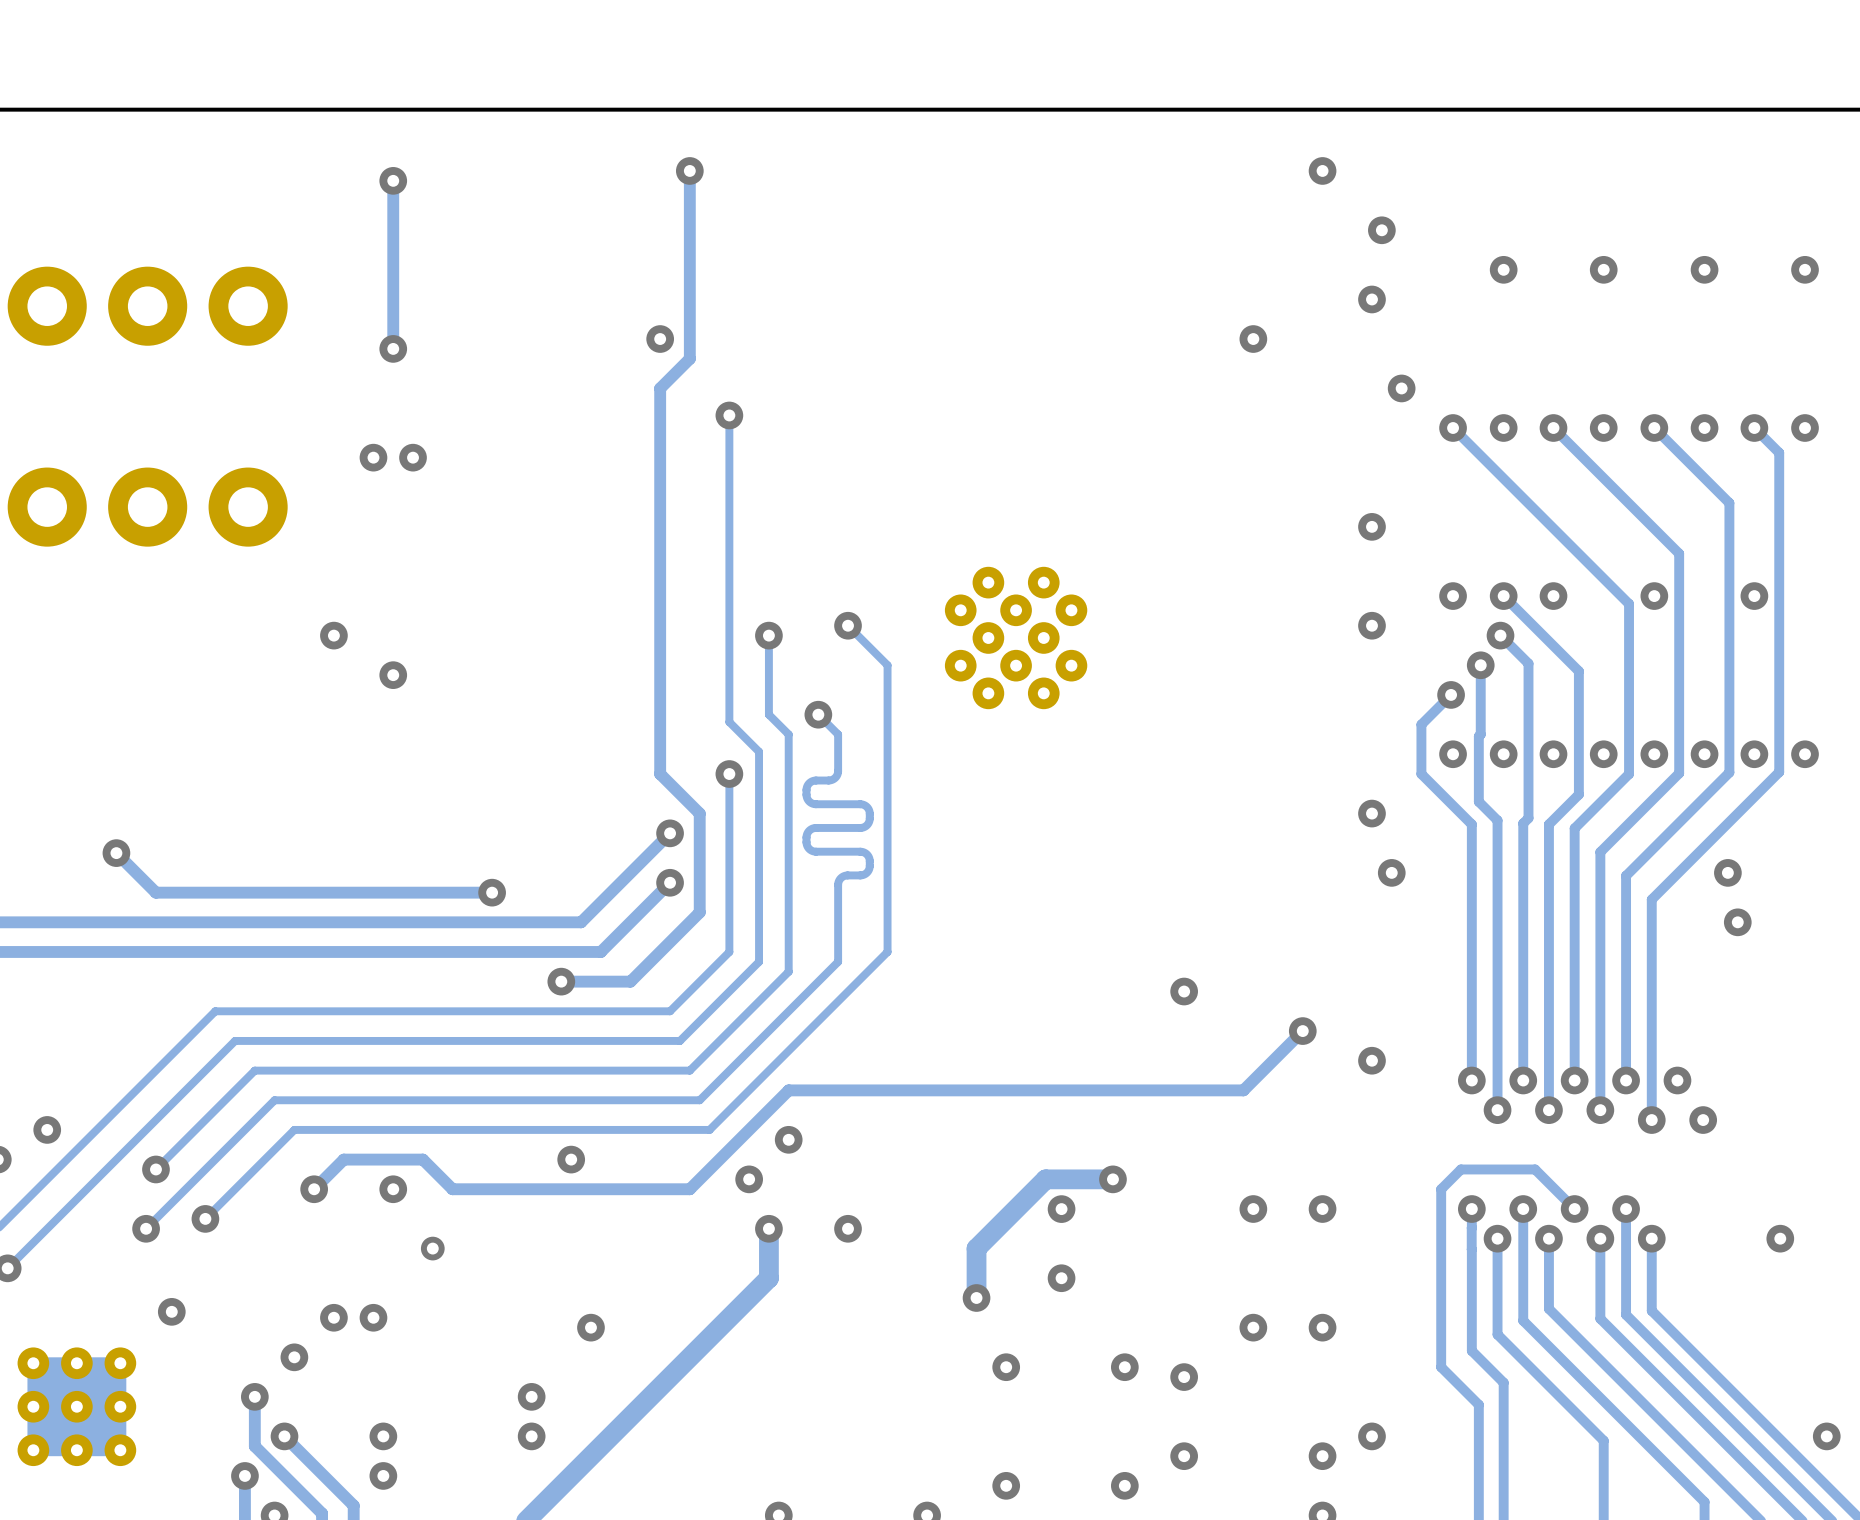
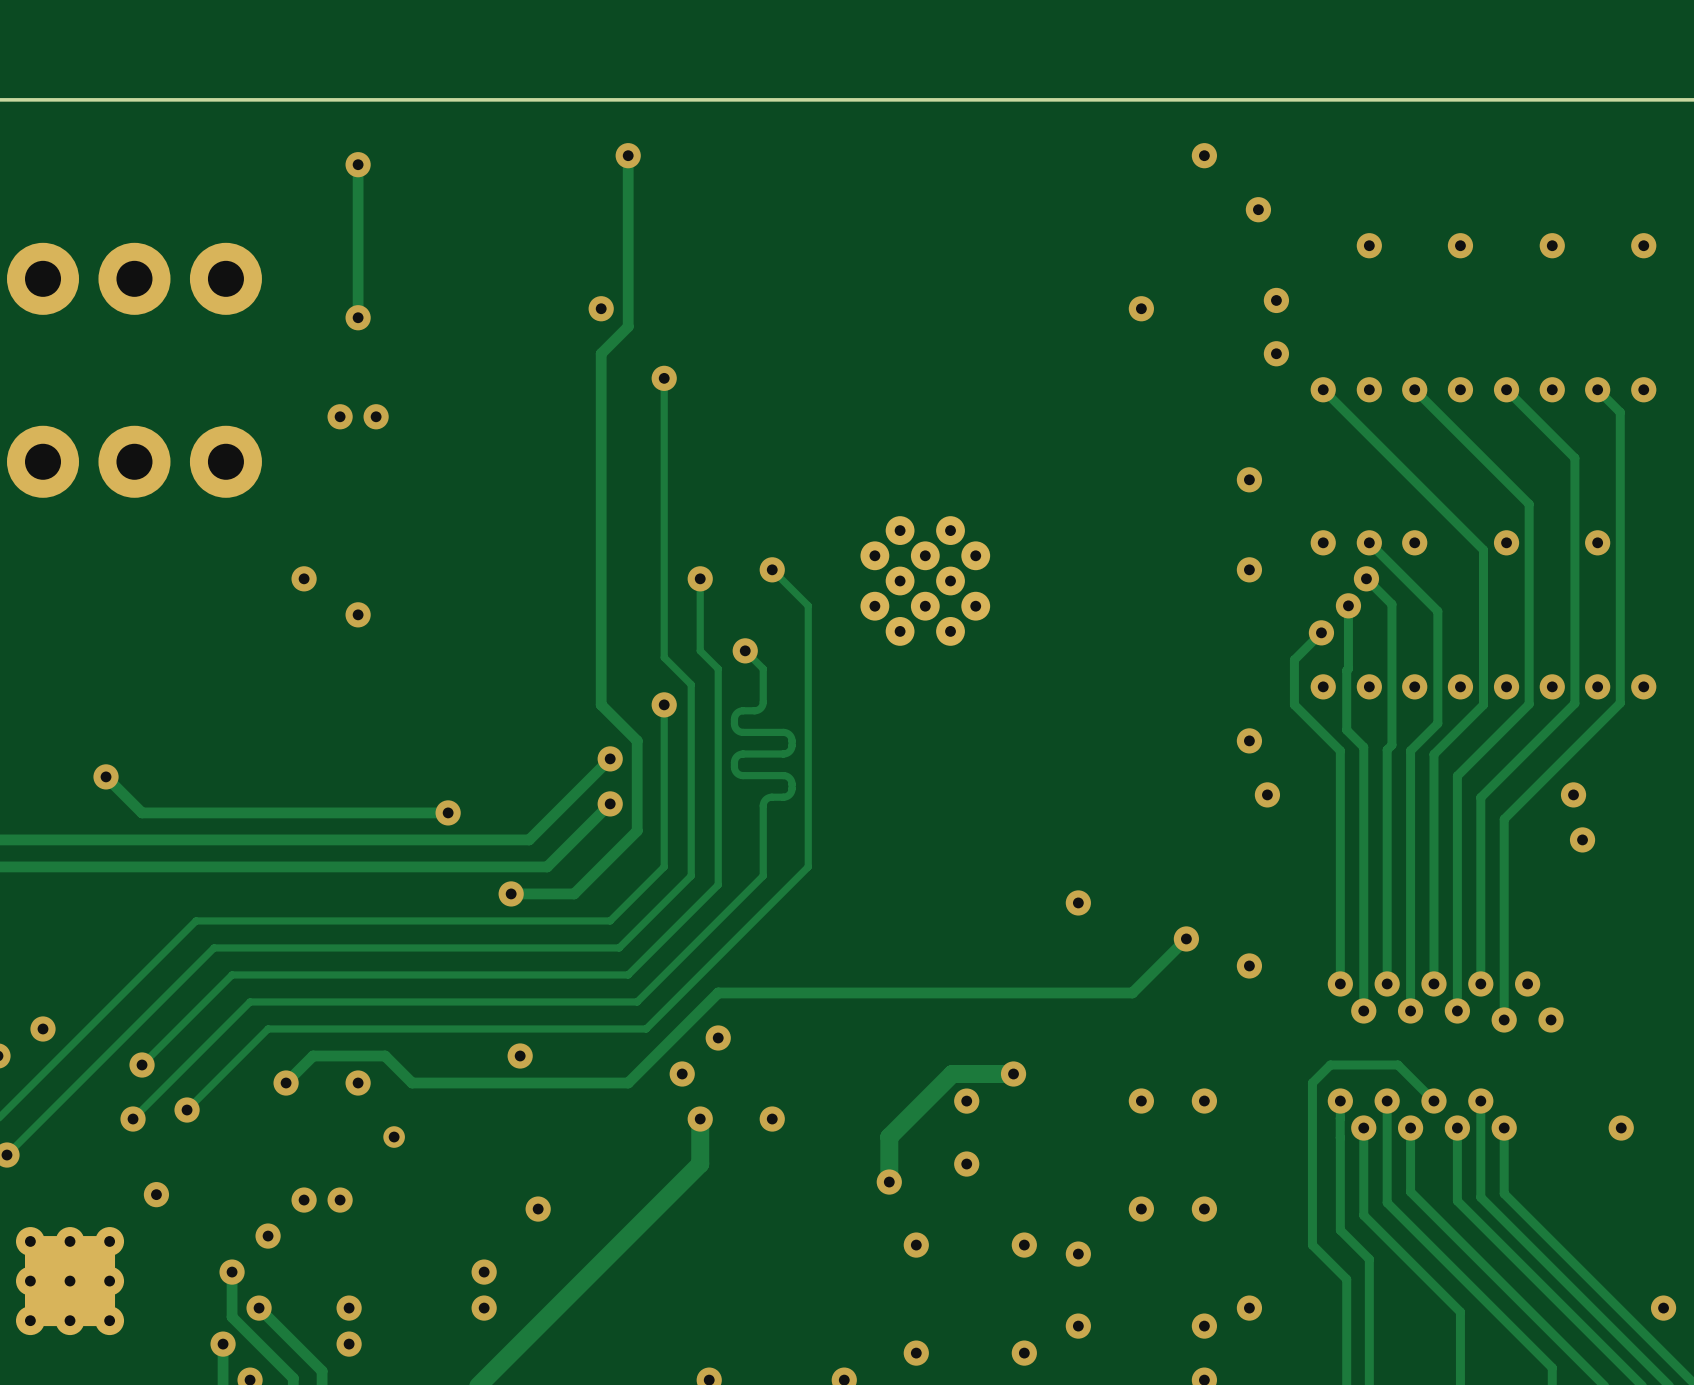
via position: (1371, 299) -> (1276, 300)

